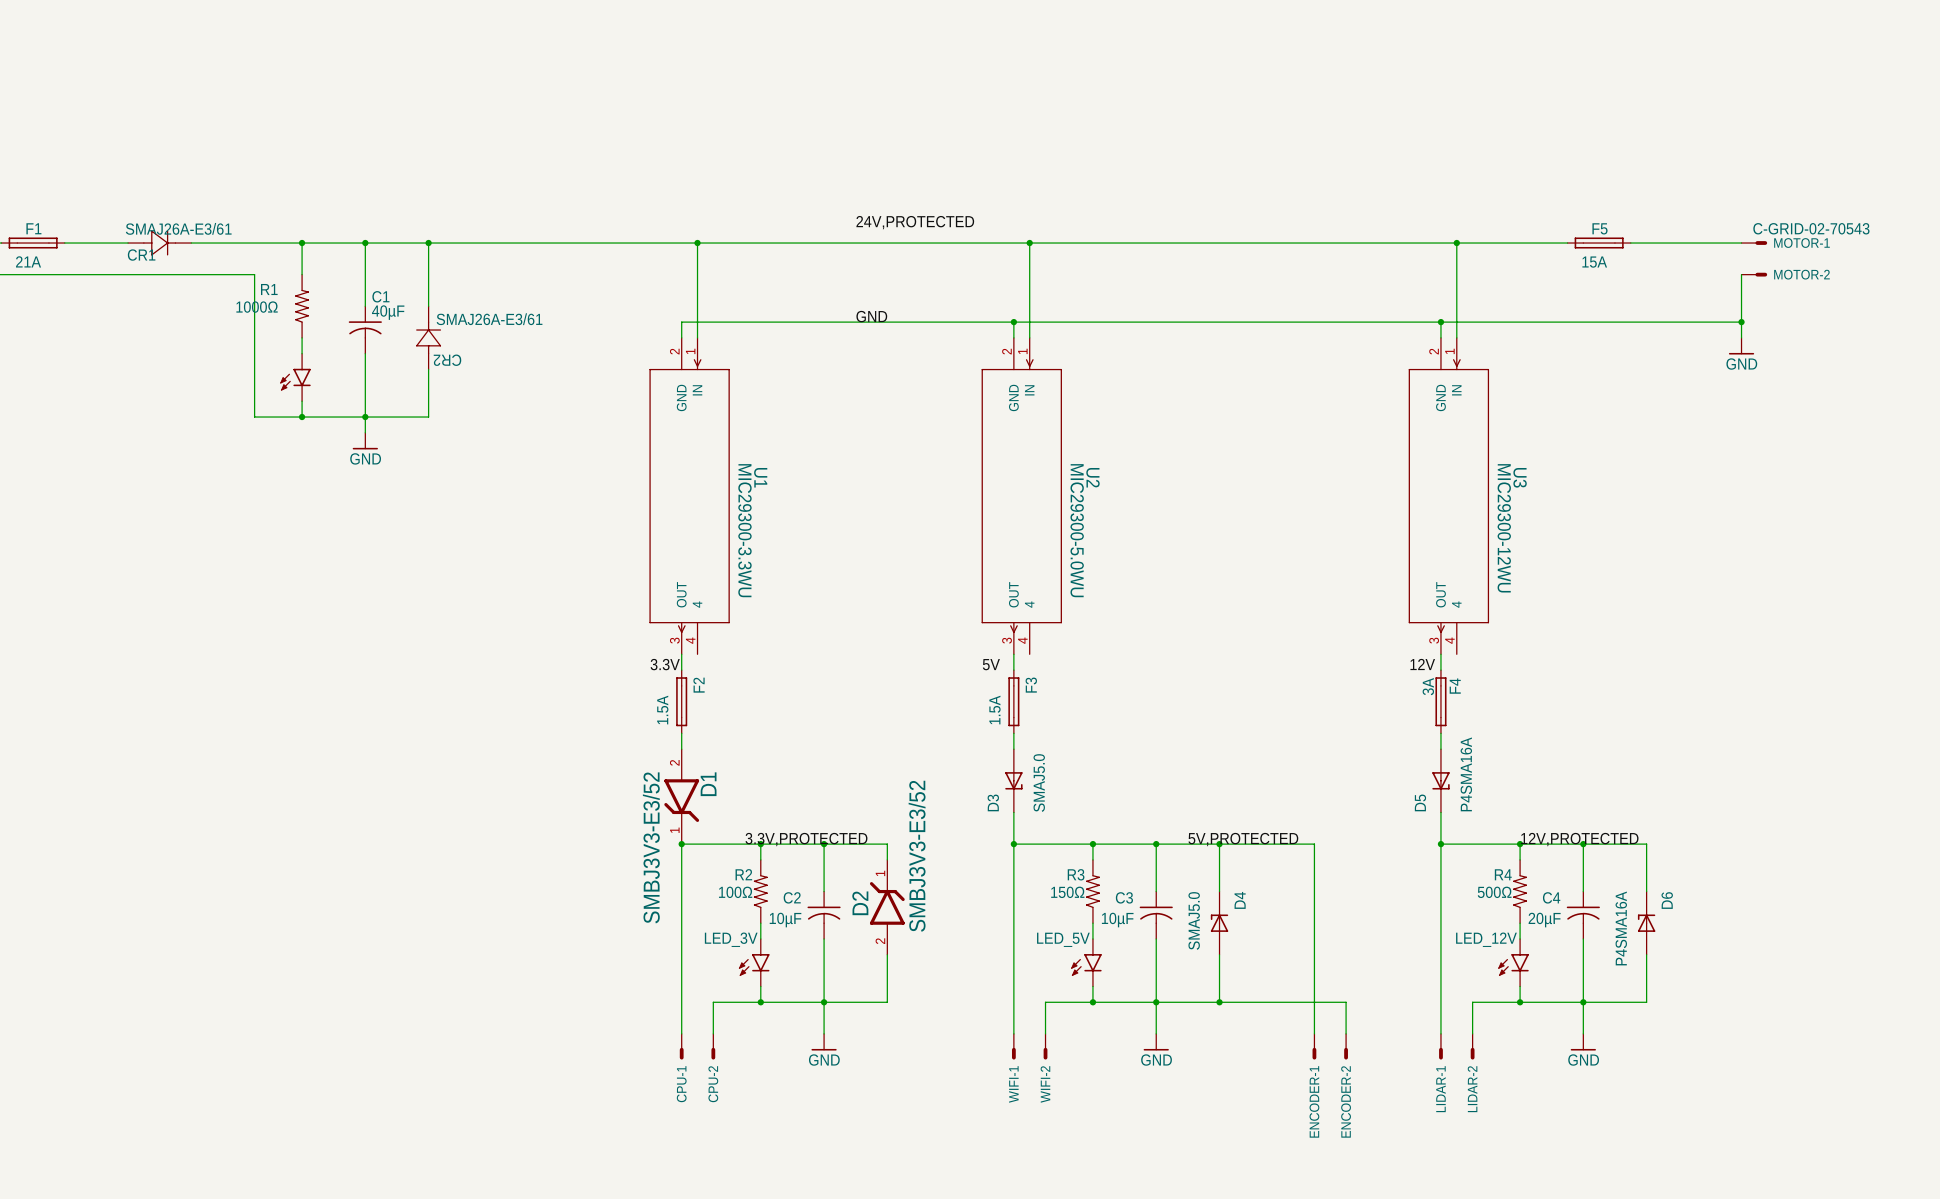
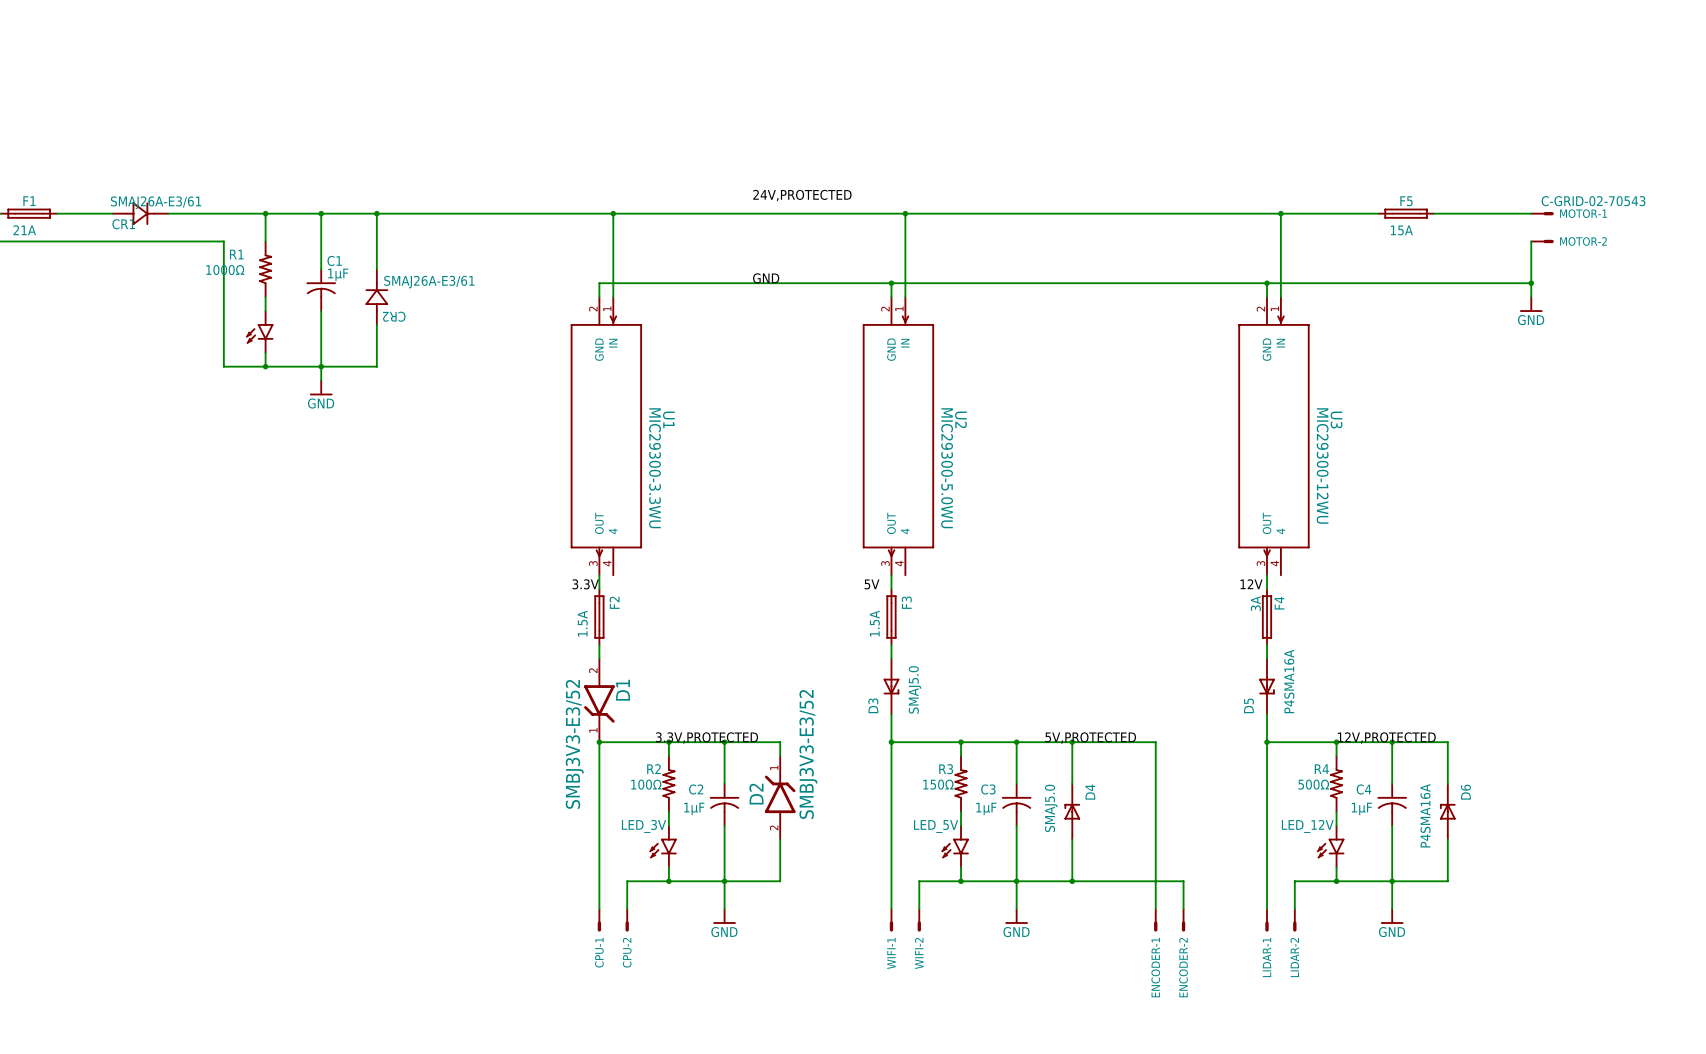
C1 value: 40µF (388, 312) -> 1µF (338, 274)
C2 value: 10µF (785, 920) -> 1µF (694, 808)
C3 value: 10µF (1117, 920) -> 1µF (986, 808)
C4 value: 20µF (1544, 920) -> 1µF (1361, 808)

